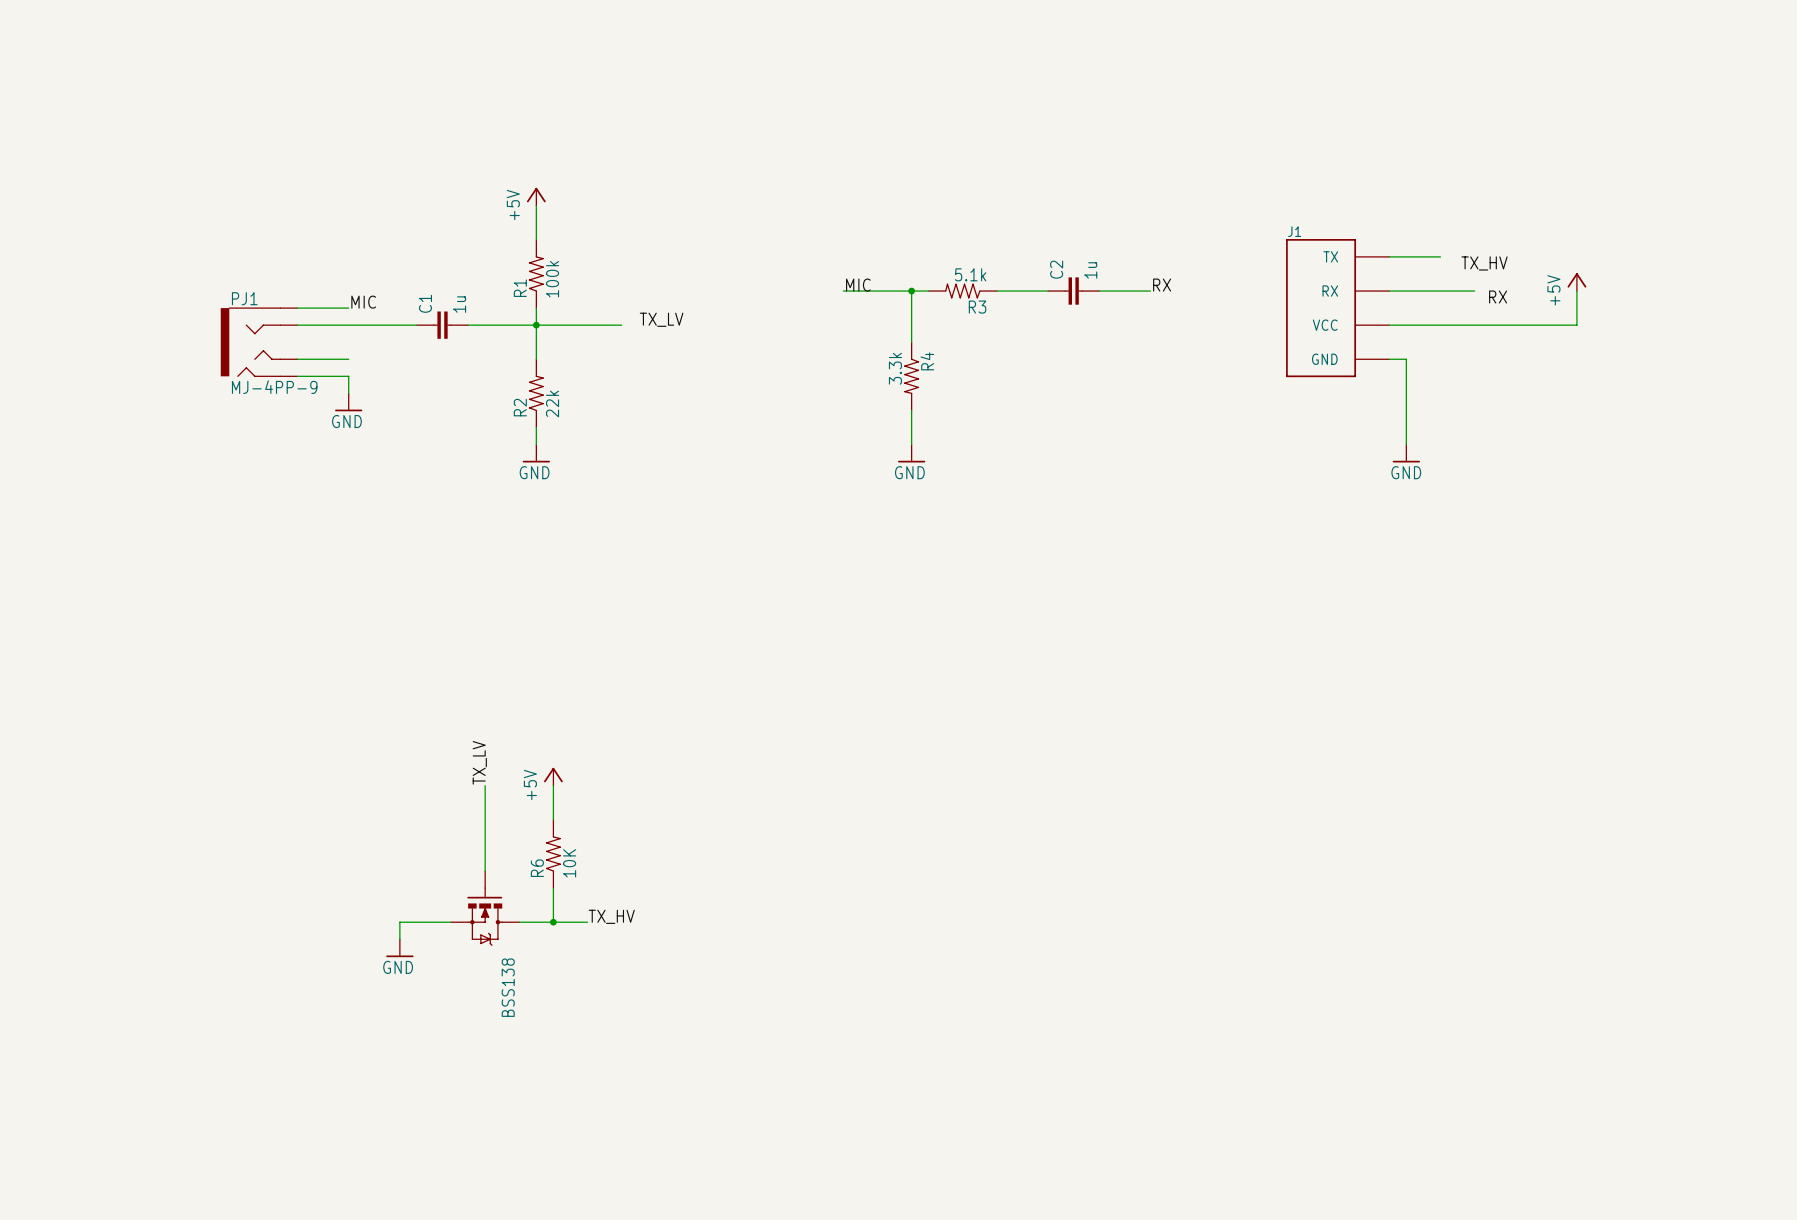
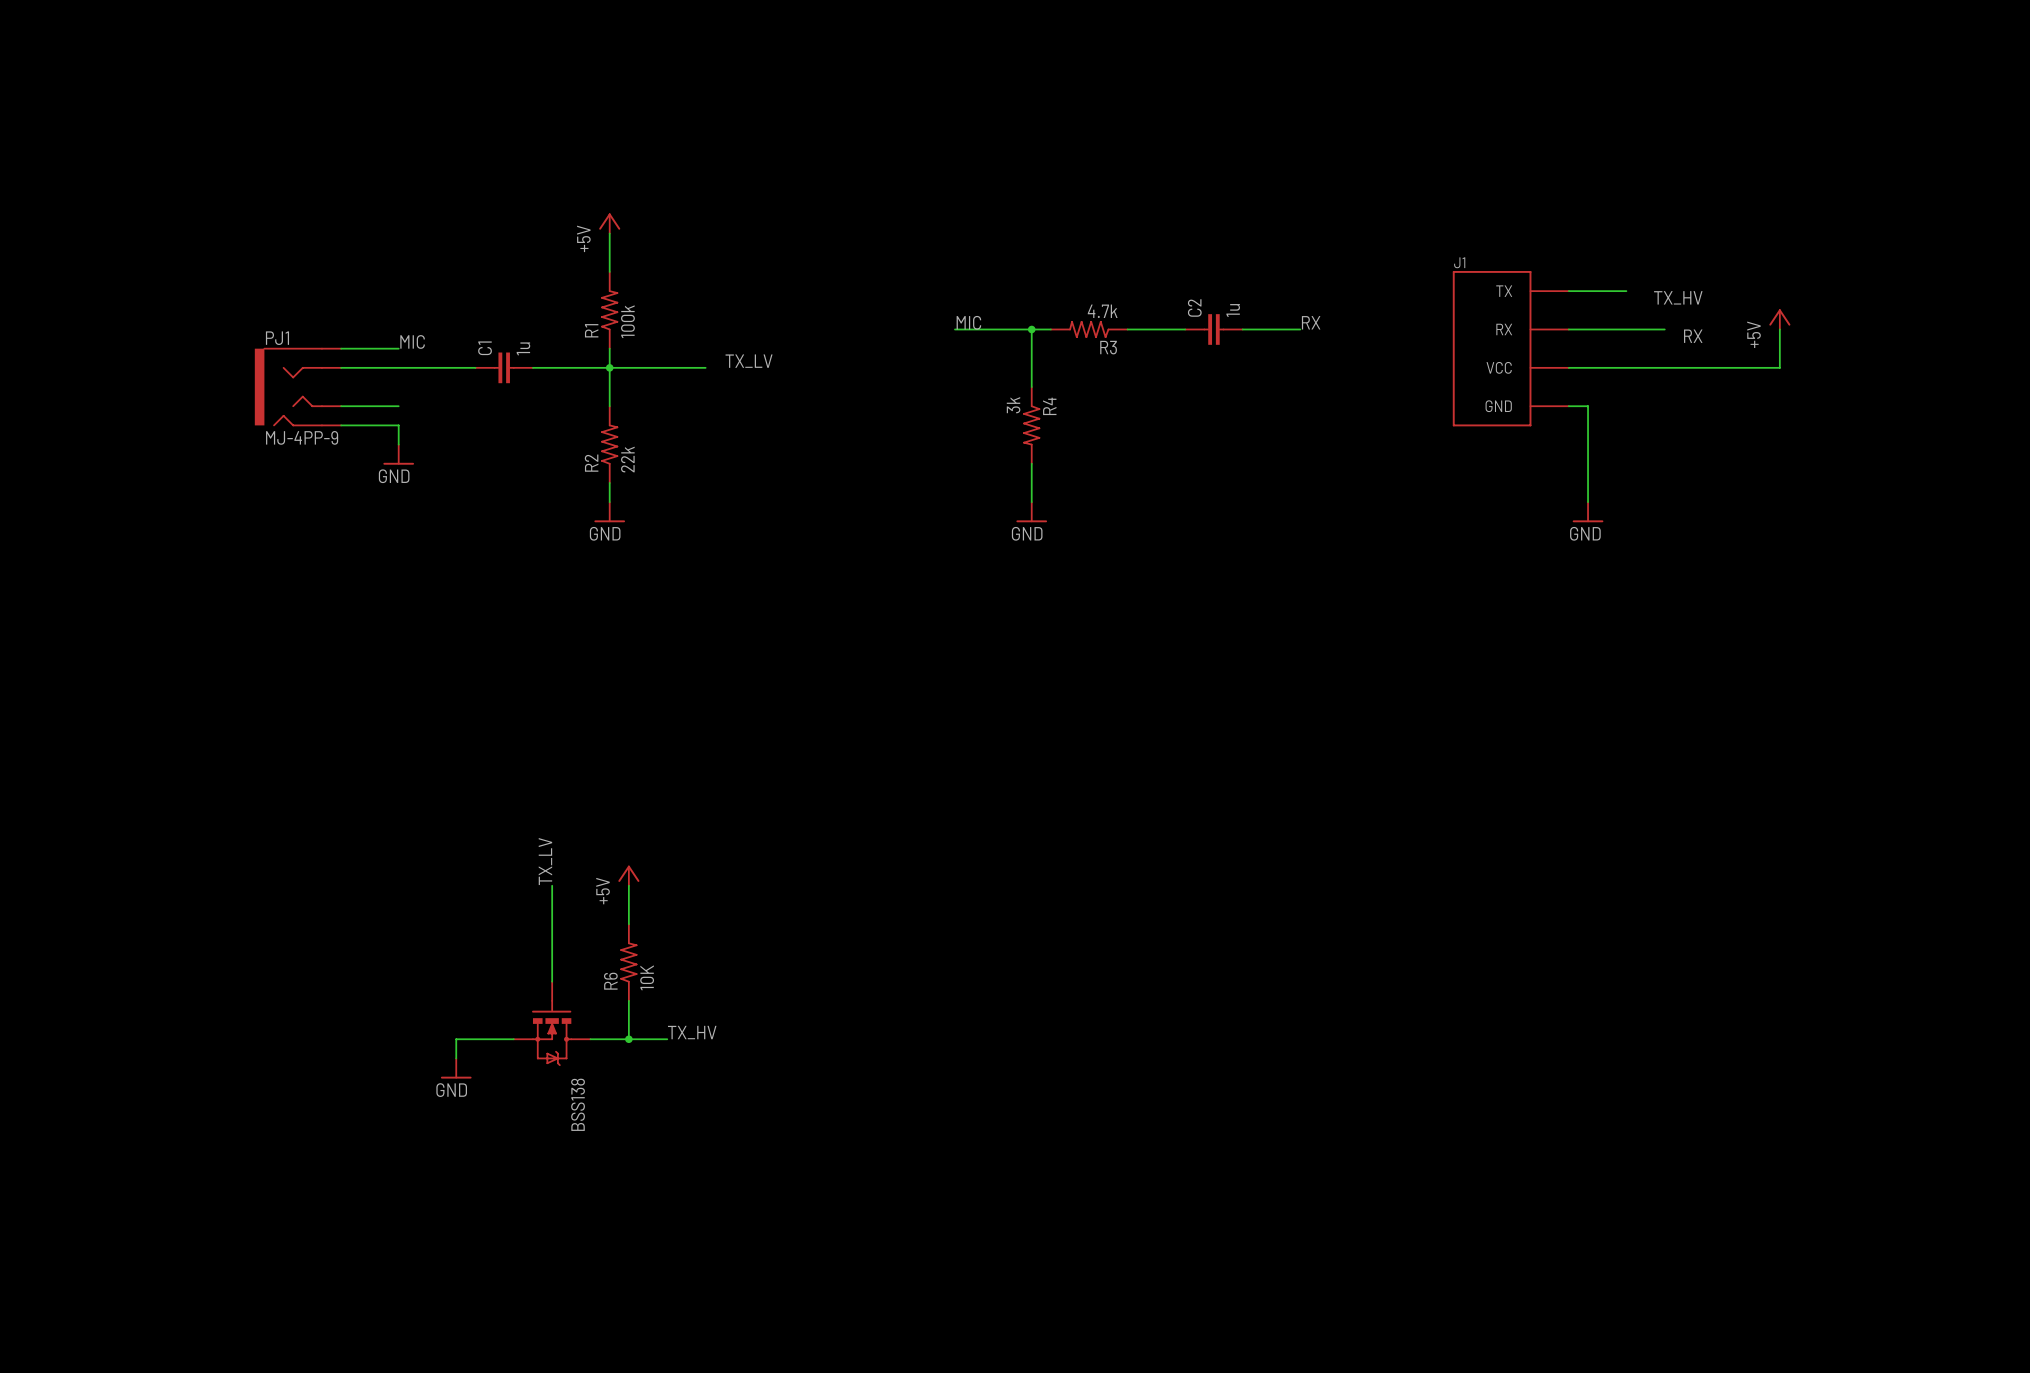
R3 value: 5.1k (970, 274) -> 4.7k (1102, 311)
R4 value: 3.3k (895, 368) -> 3k (1013, 405)

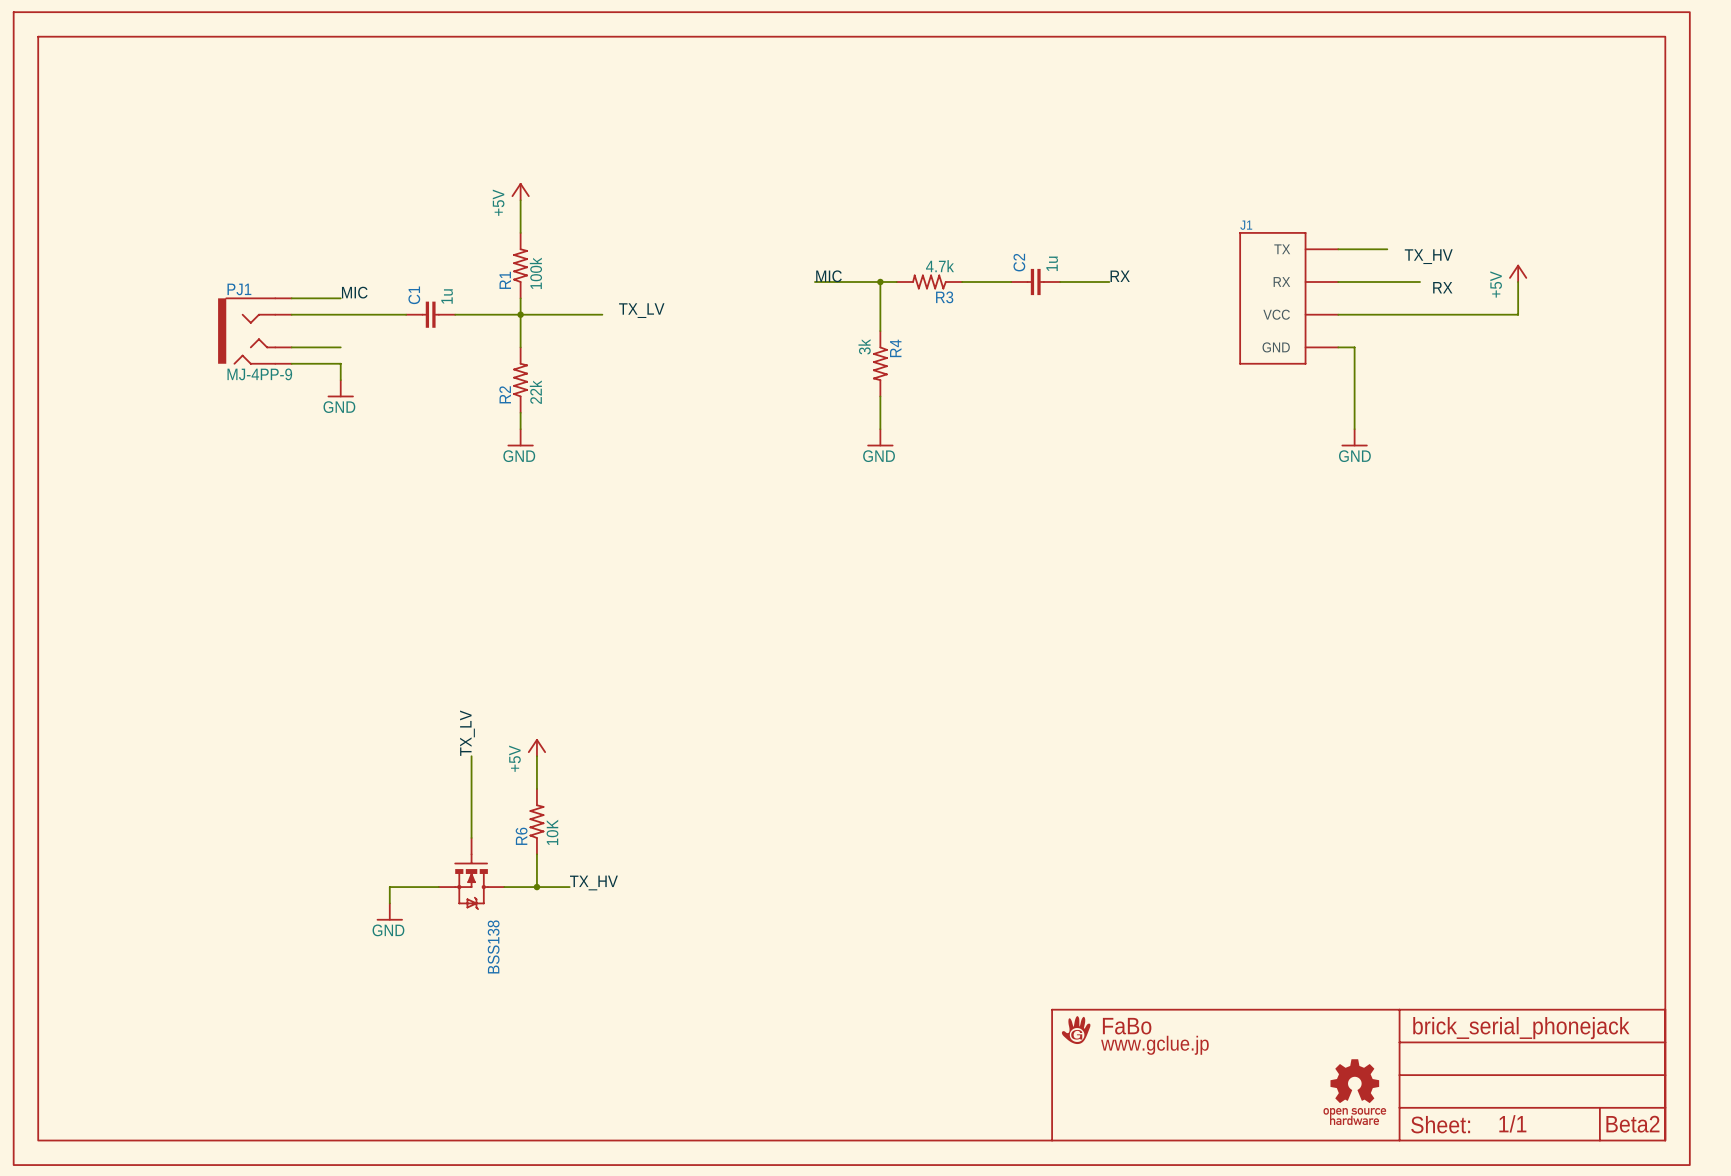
part: none -> (851, 588)
part: none -> (1354, 1092)
text: none -> Beta2 (1632, 1124)

